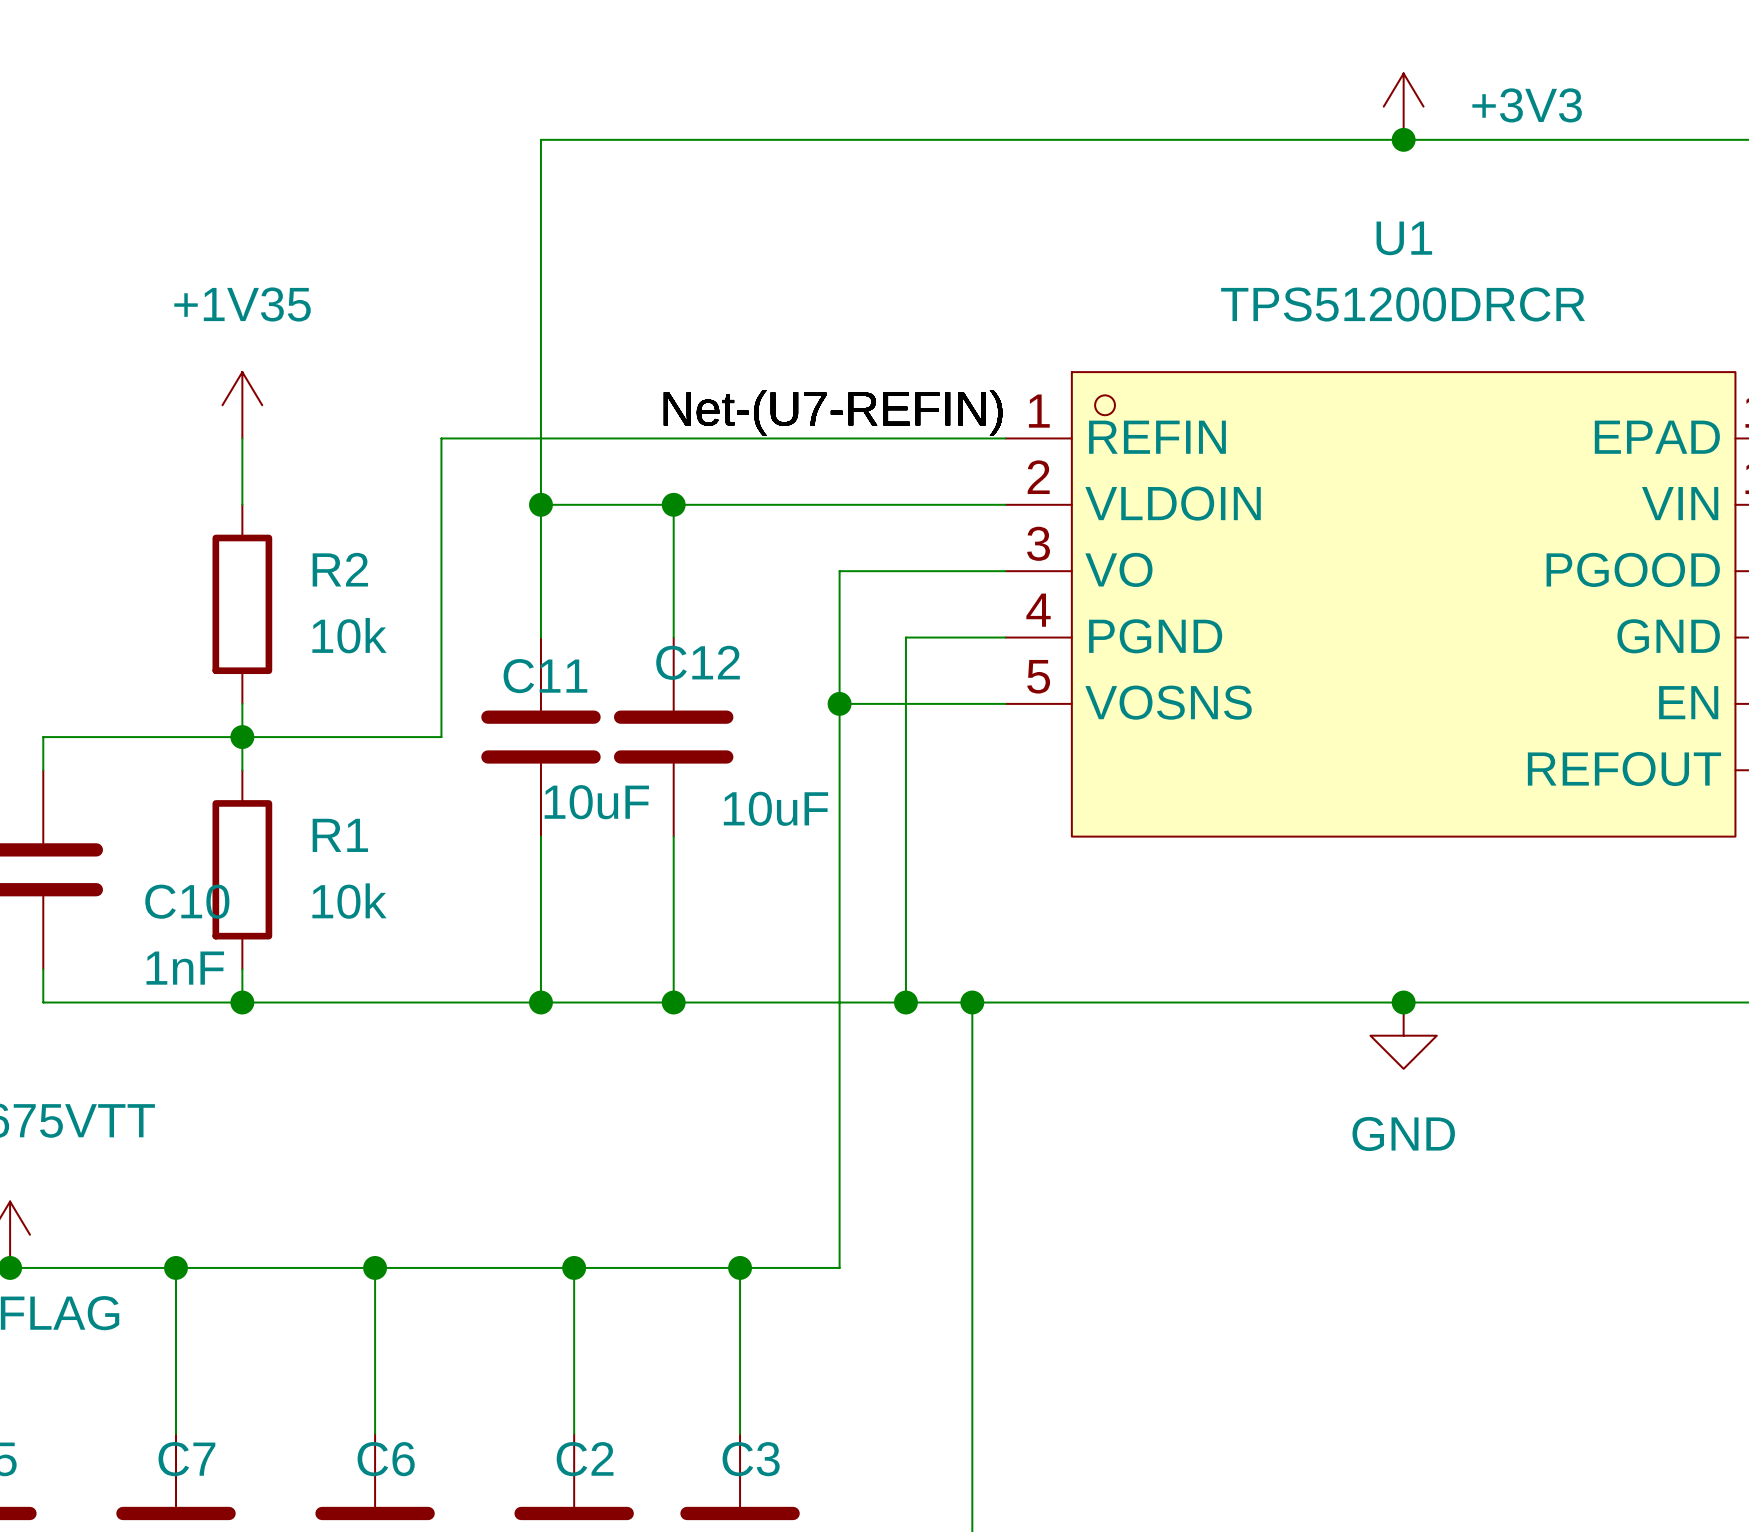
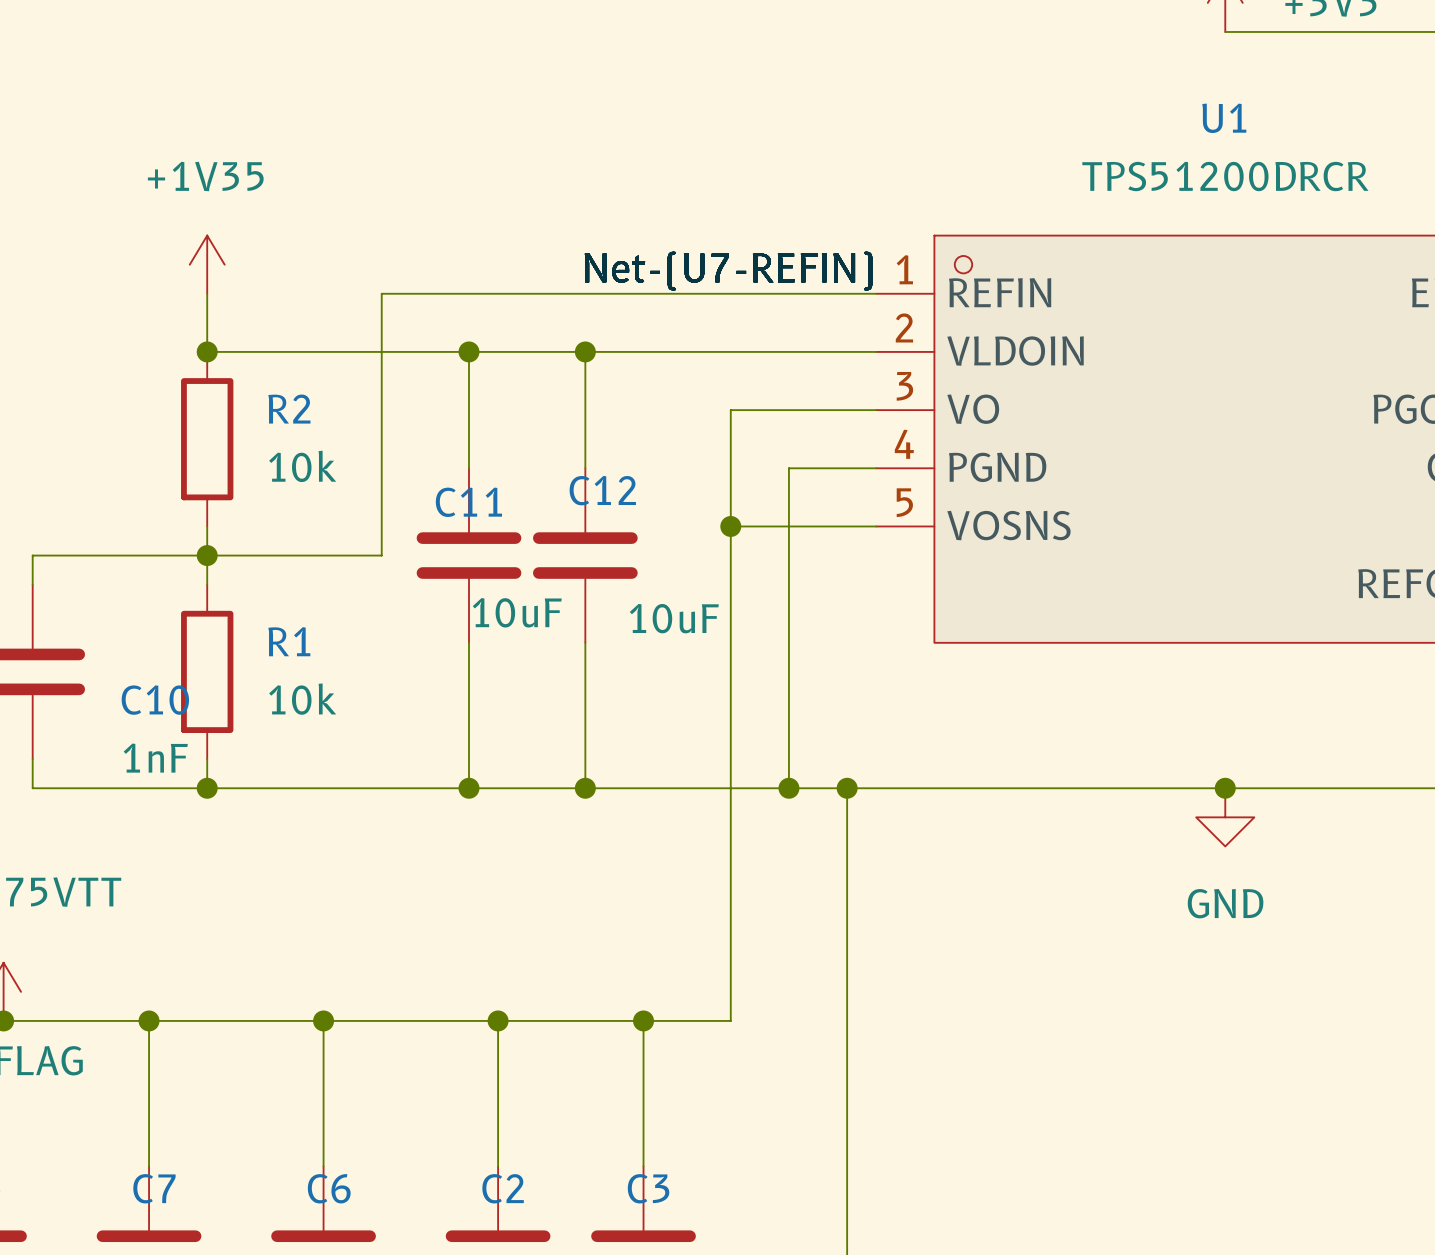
wire: (1403, 139) (540, 139) (540, 504) -> (207, 351) (469, 351)
junction: (1403, 139) -> none
junction: none -> (207, 351)

